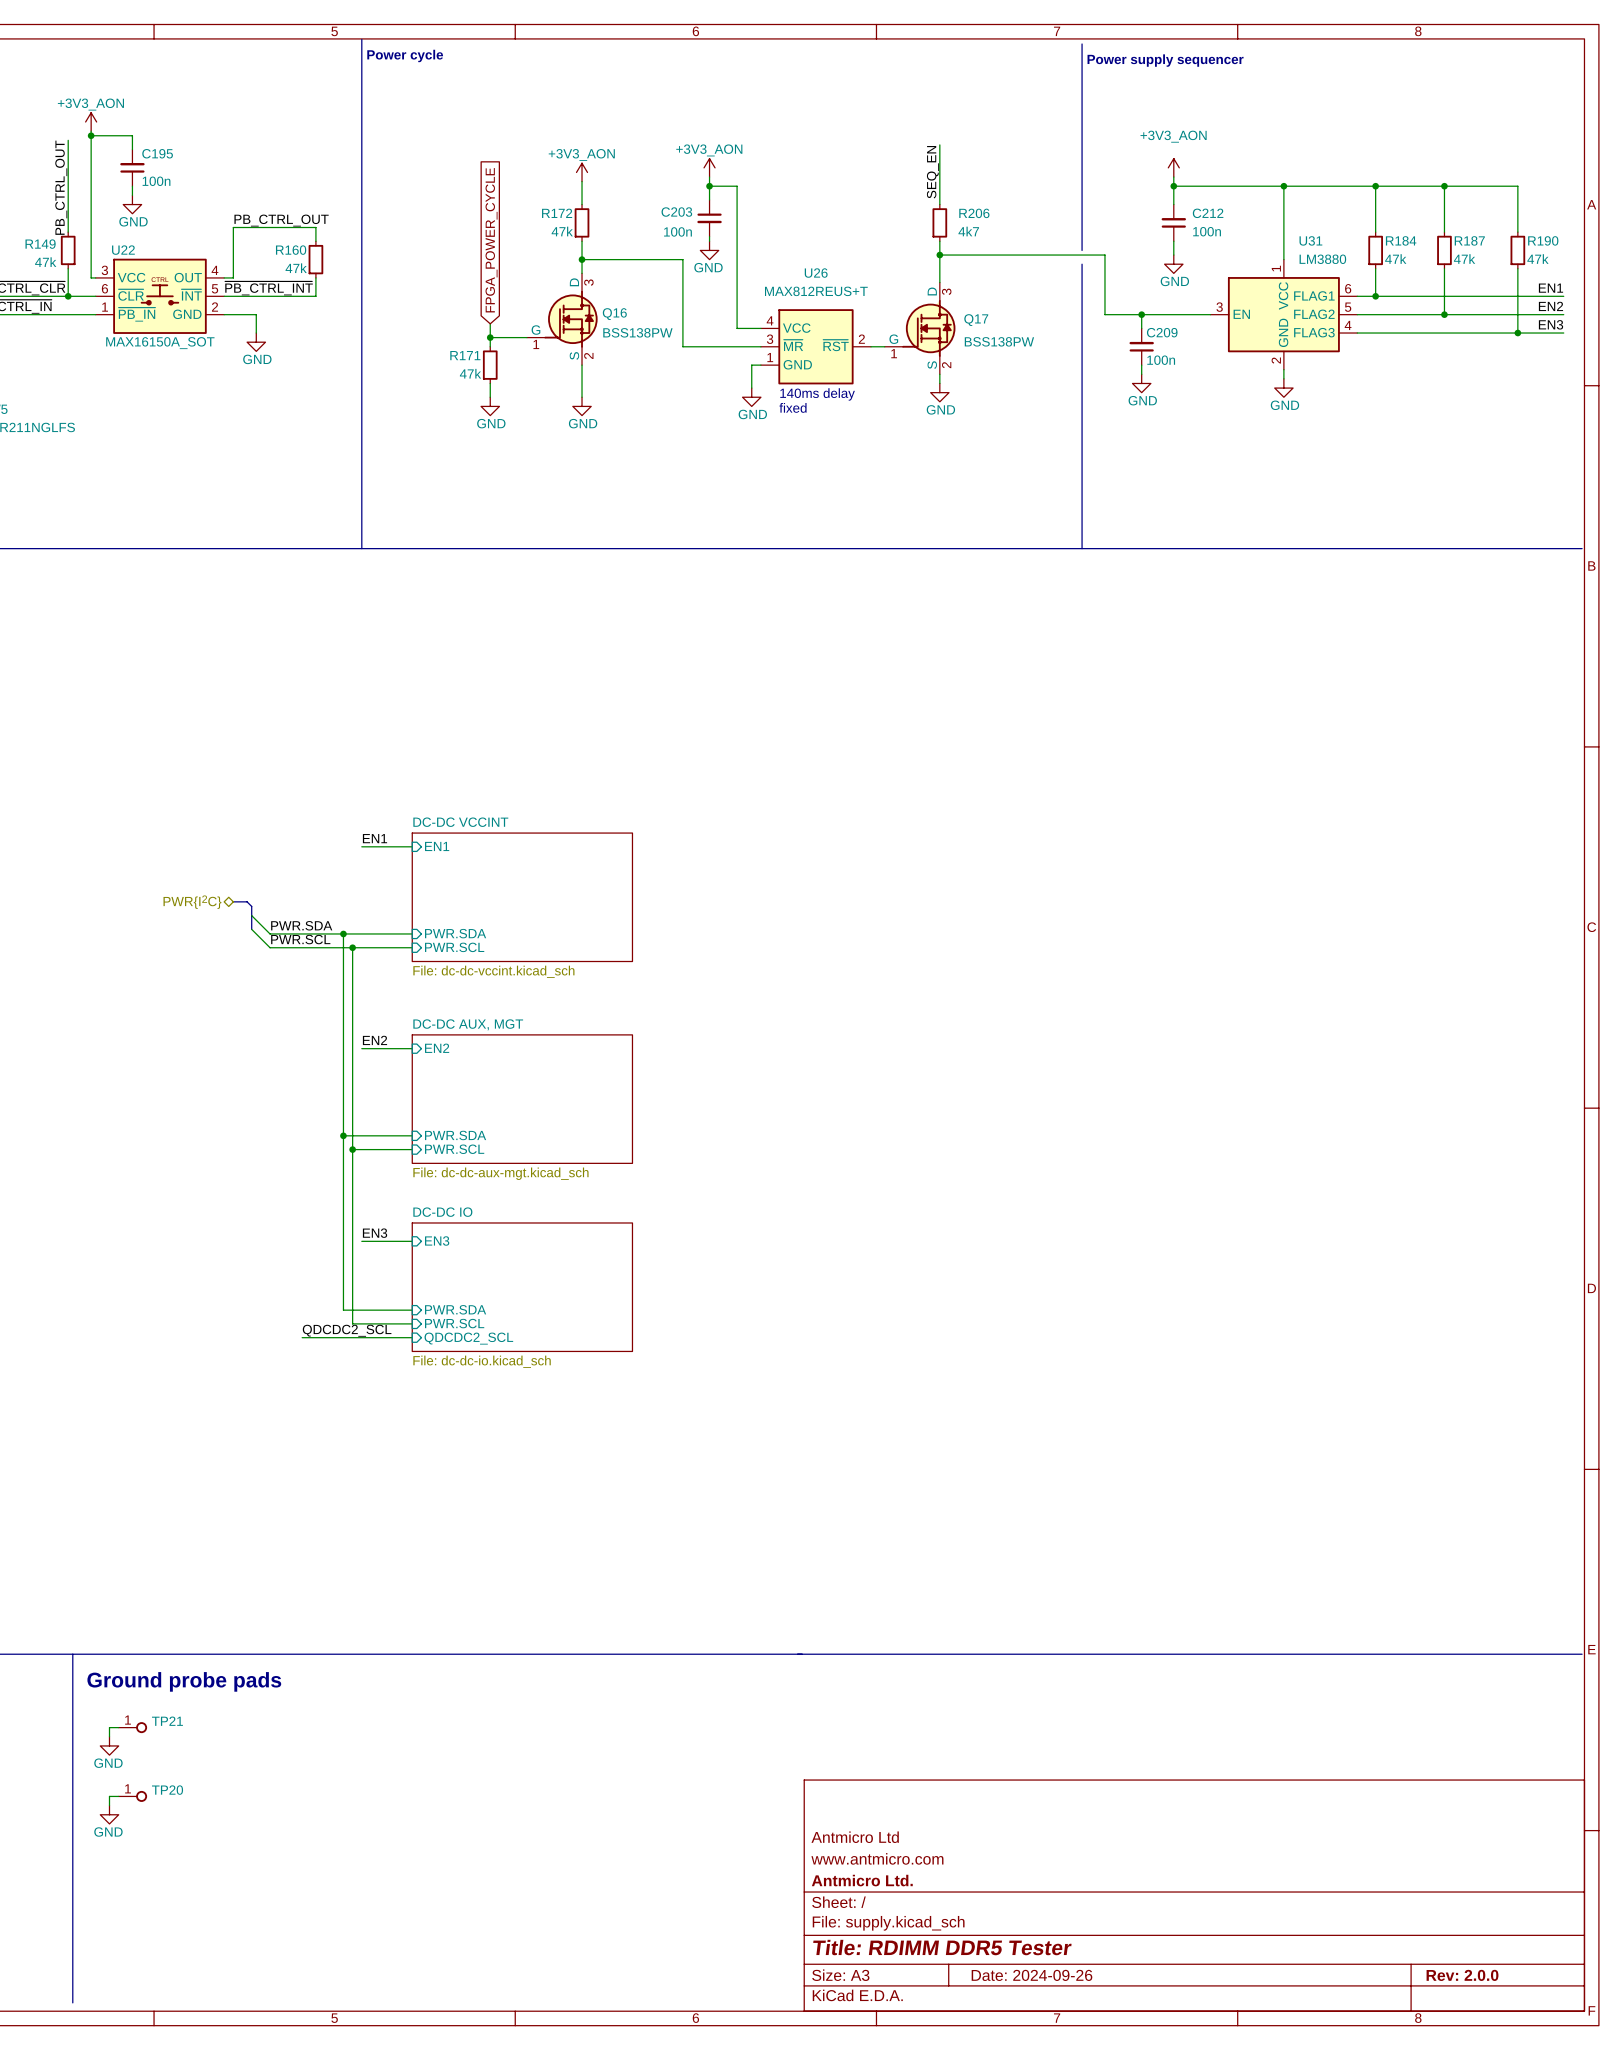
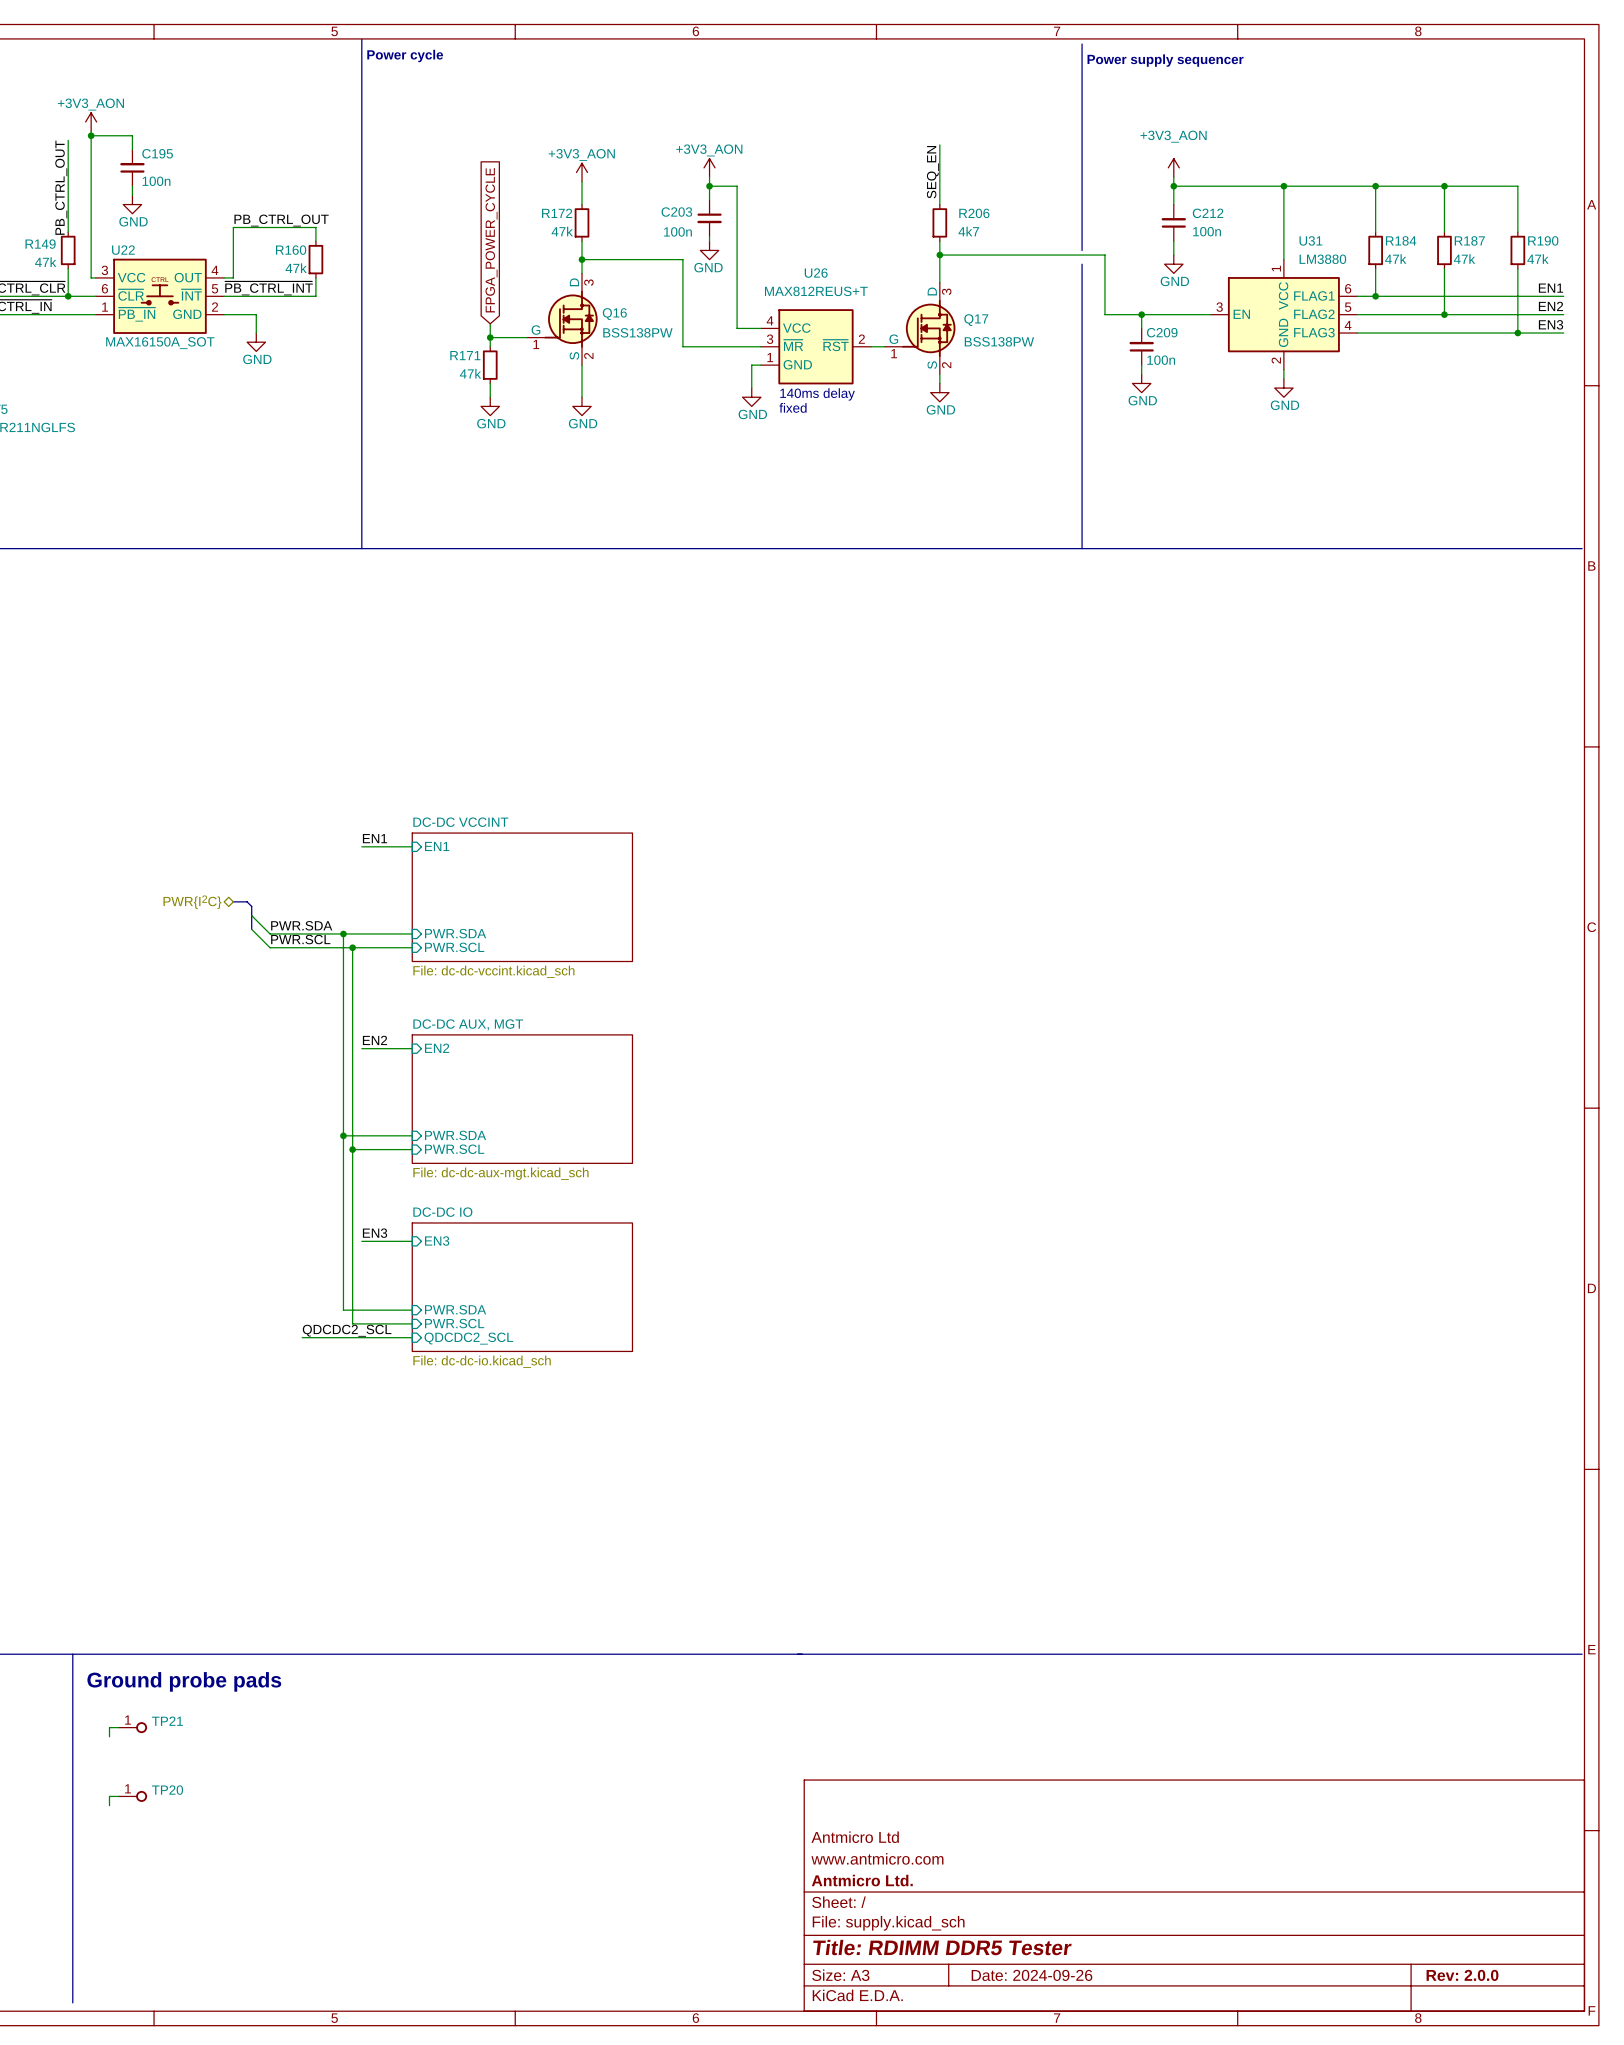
power symbol: GND (109, 1745) -> none
power symbol: GND (109, 1814) -> none

